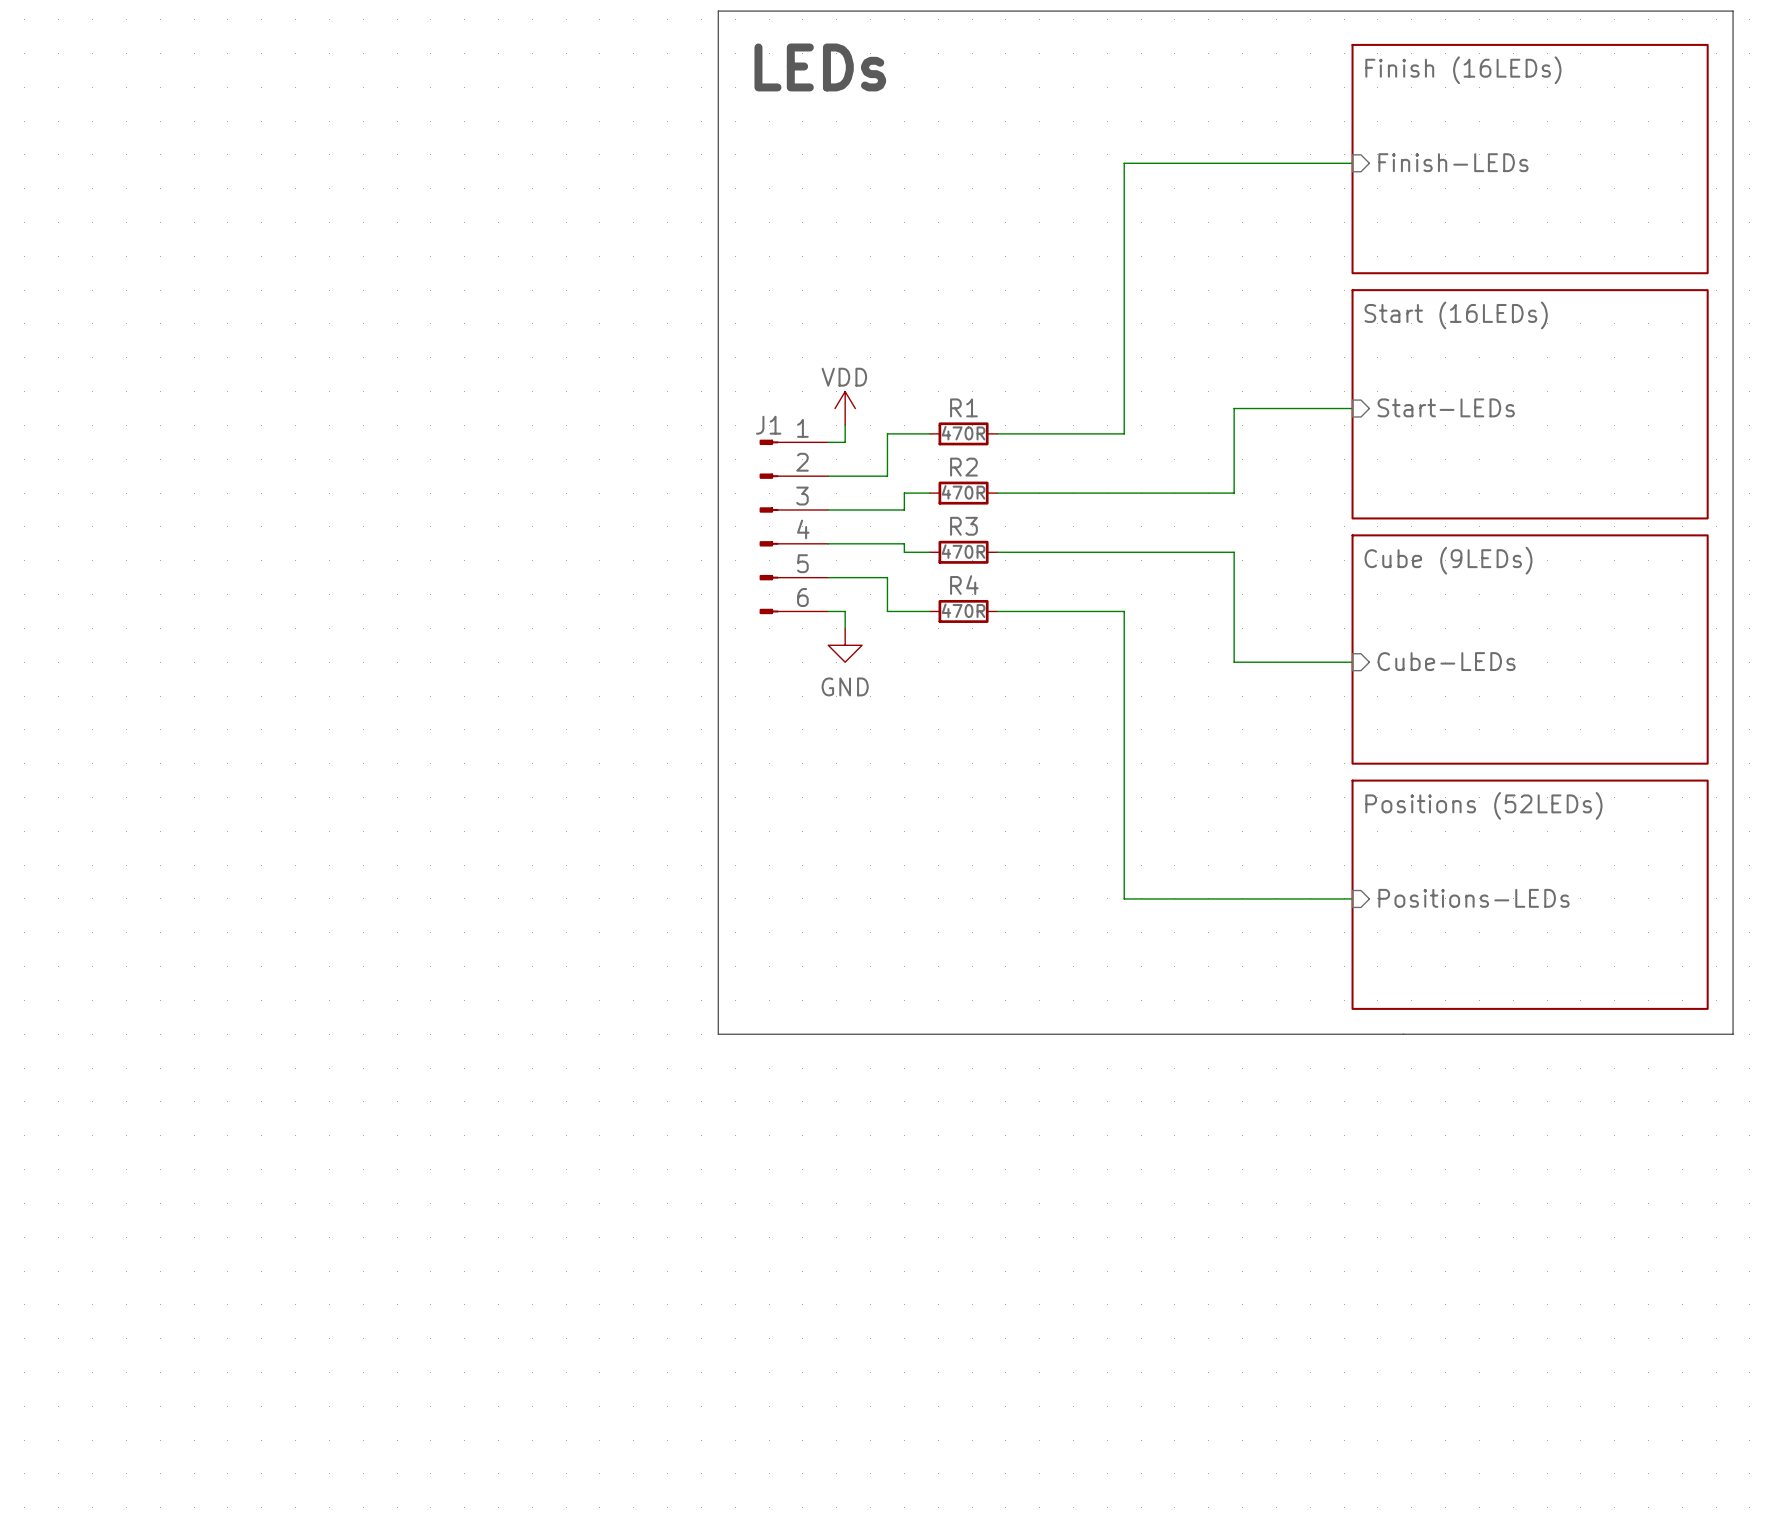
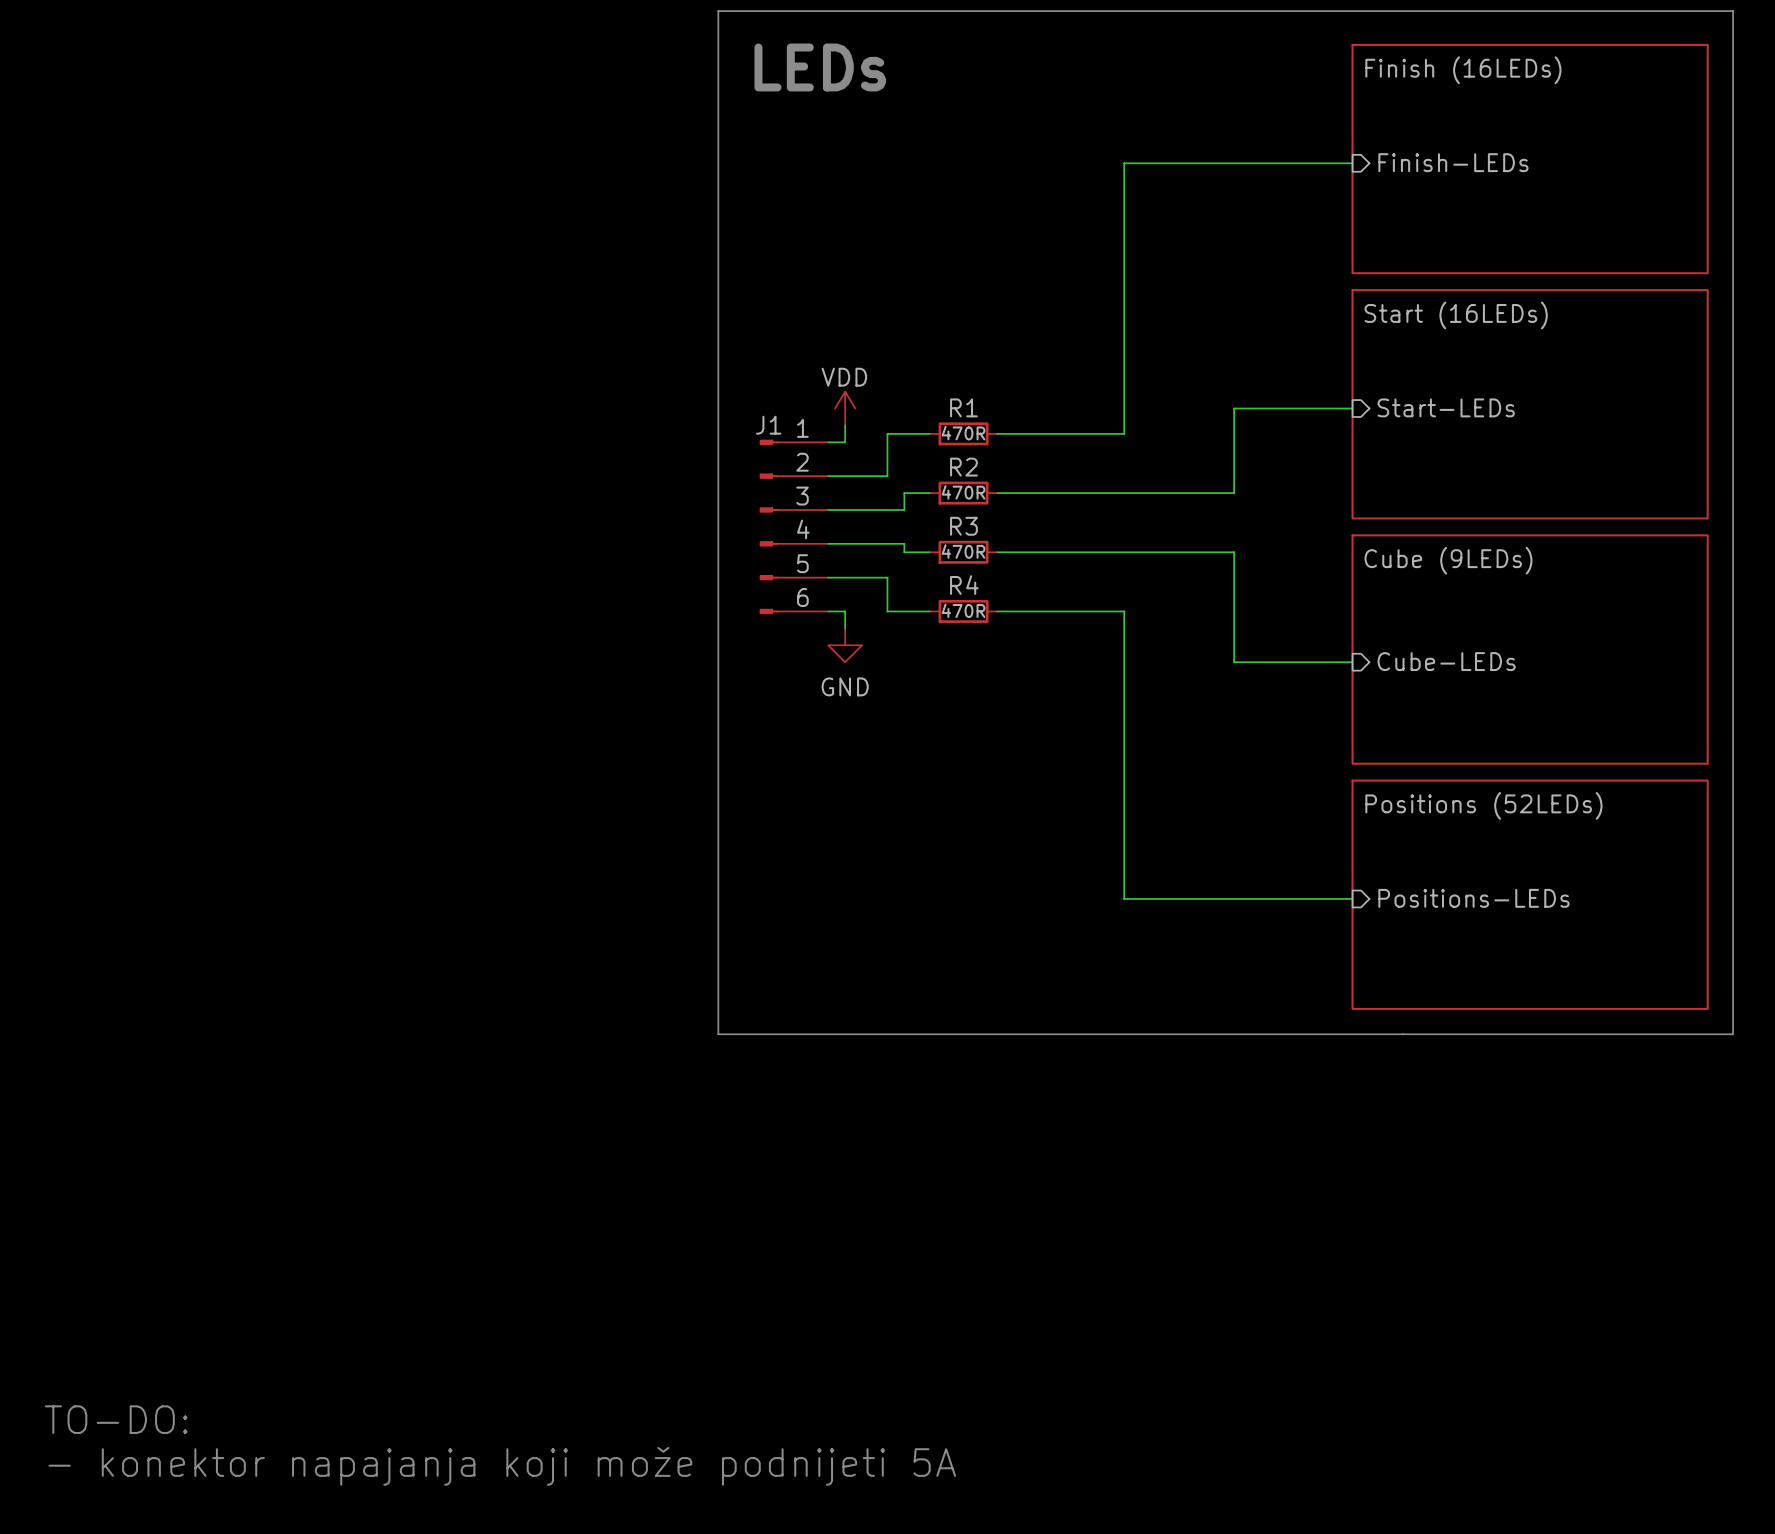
text: none -> TO-DO: (116, 1419)
text: none -> - konektor napajanja koji može podnijeti 5A (502, 1466)

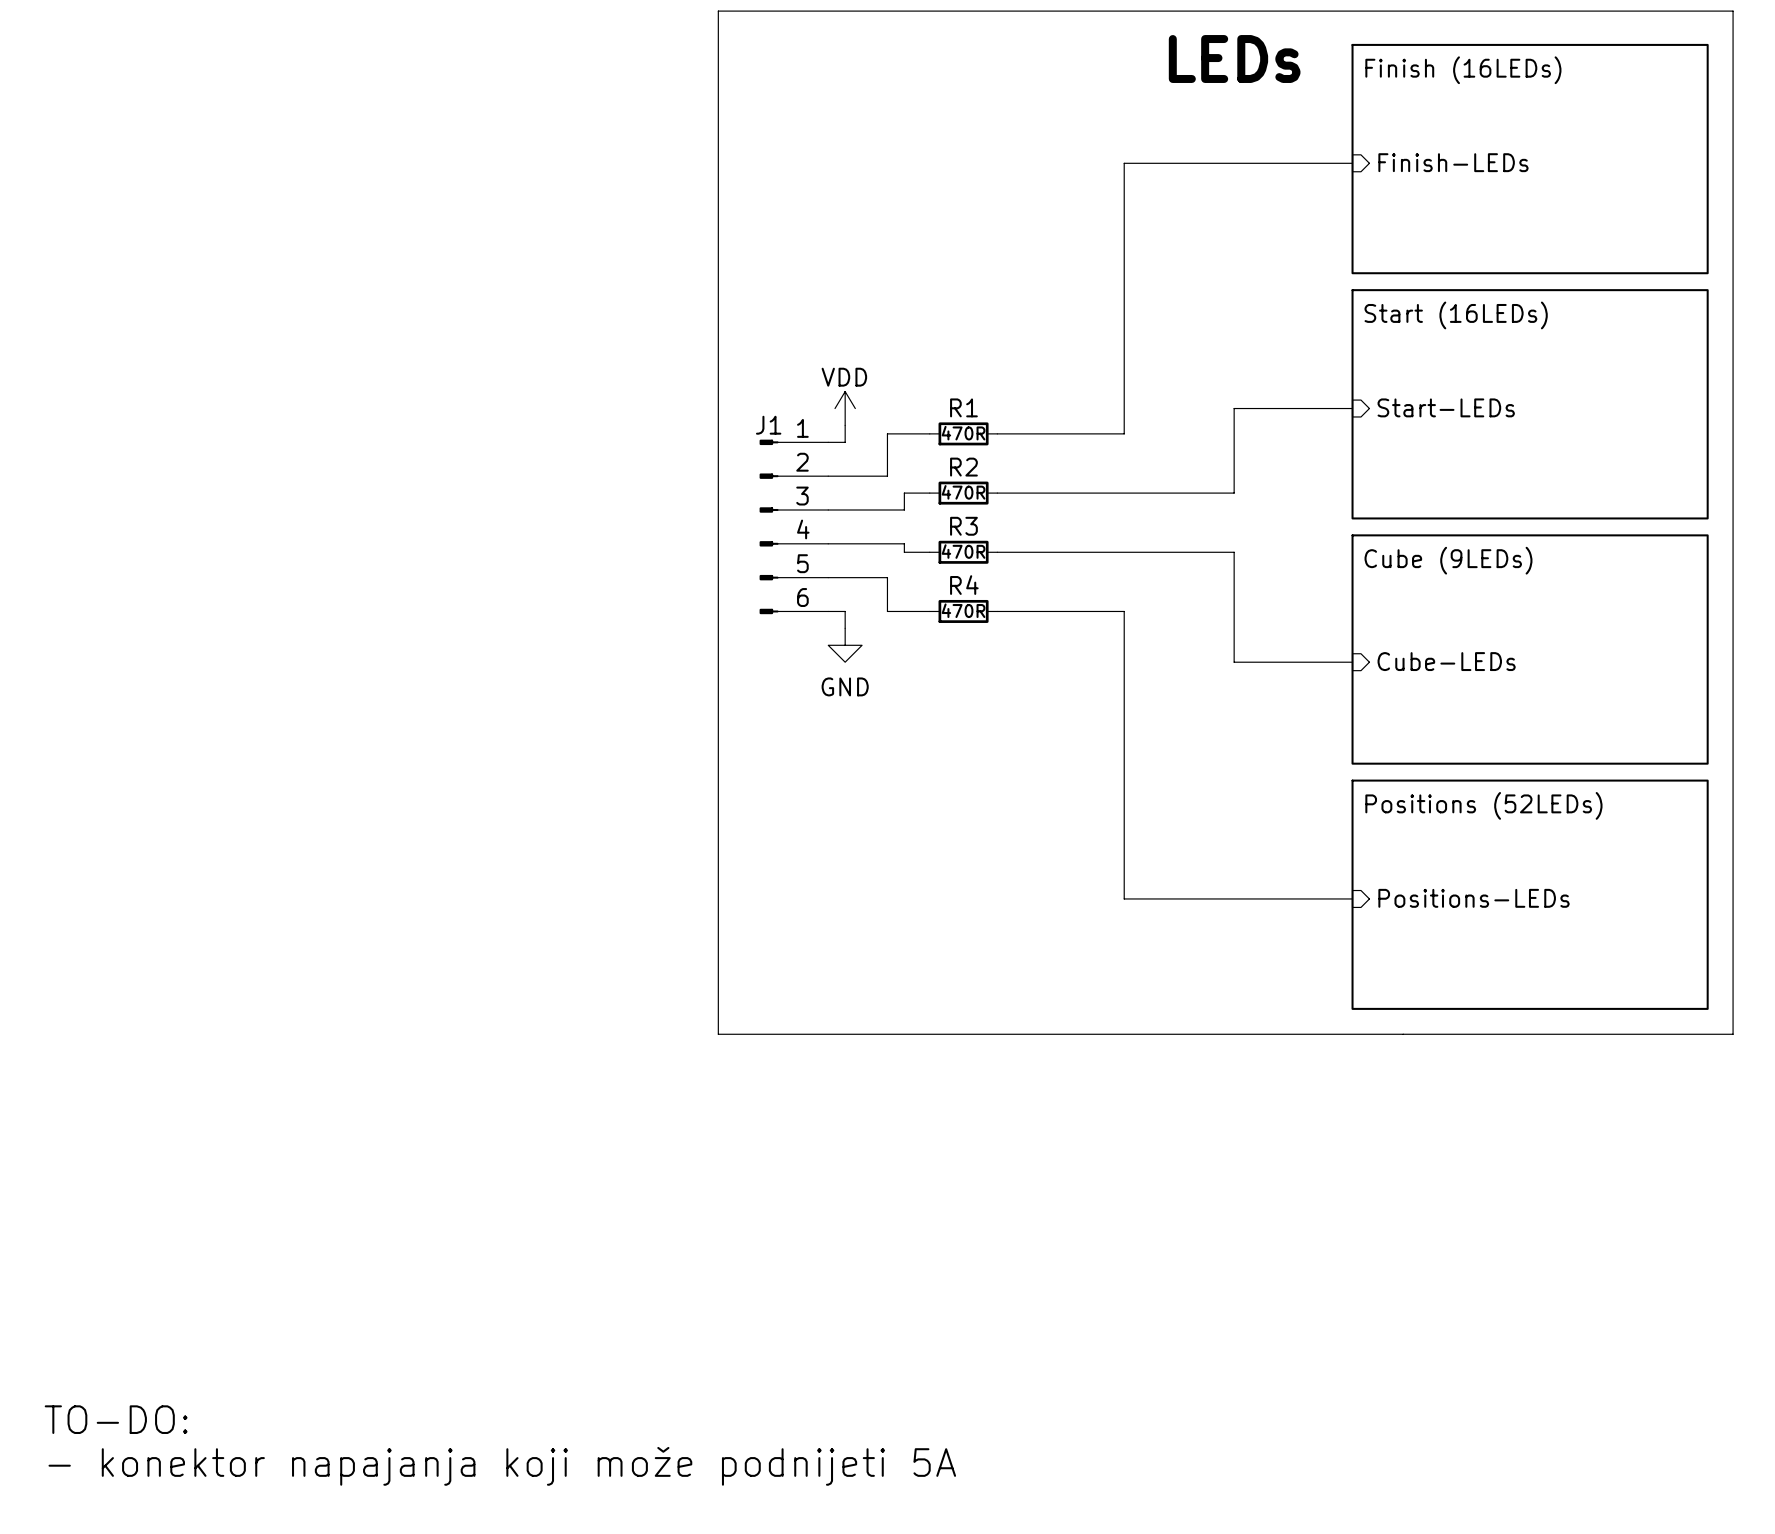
text: none -> LEDs (1234, 59)
text: LEDs (820, 67) -> none

